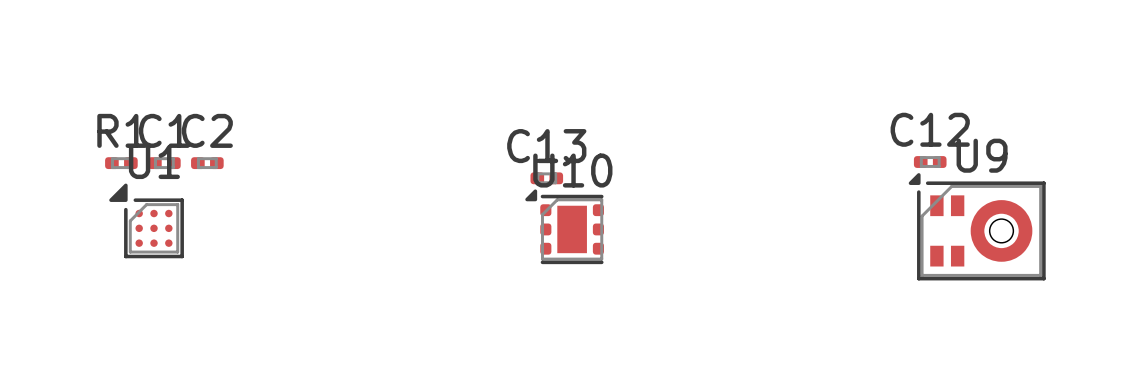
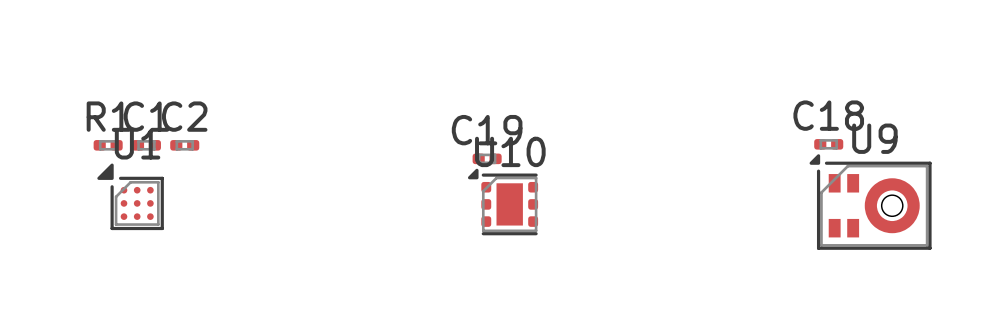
C12 name: C12 (930, 129) -> C18 (828, 115)
C13 name: C13 (546, 146) -> C19 (487, 130)

